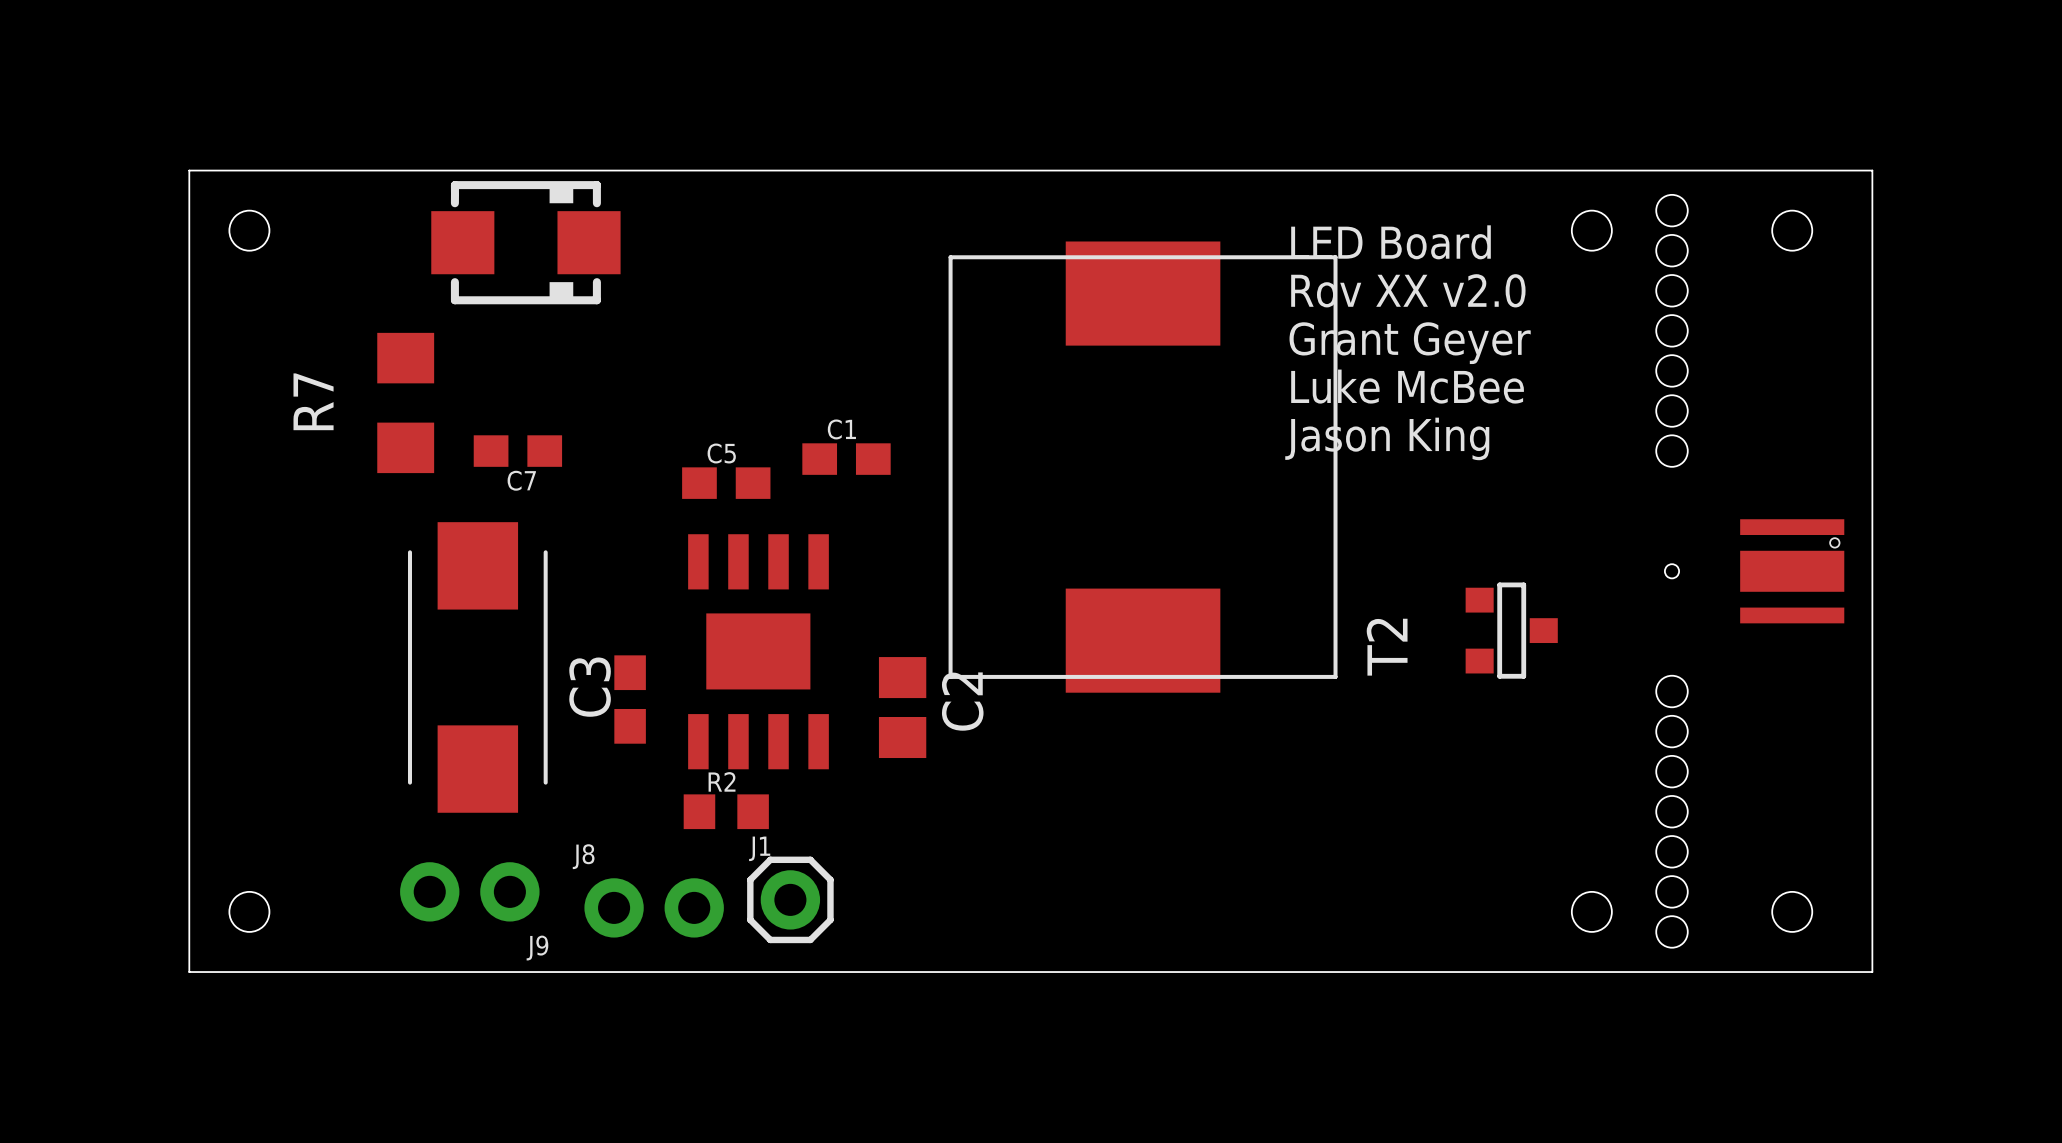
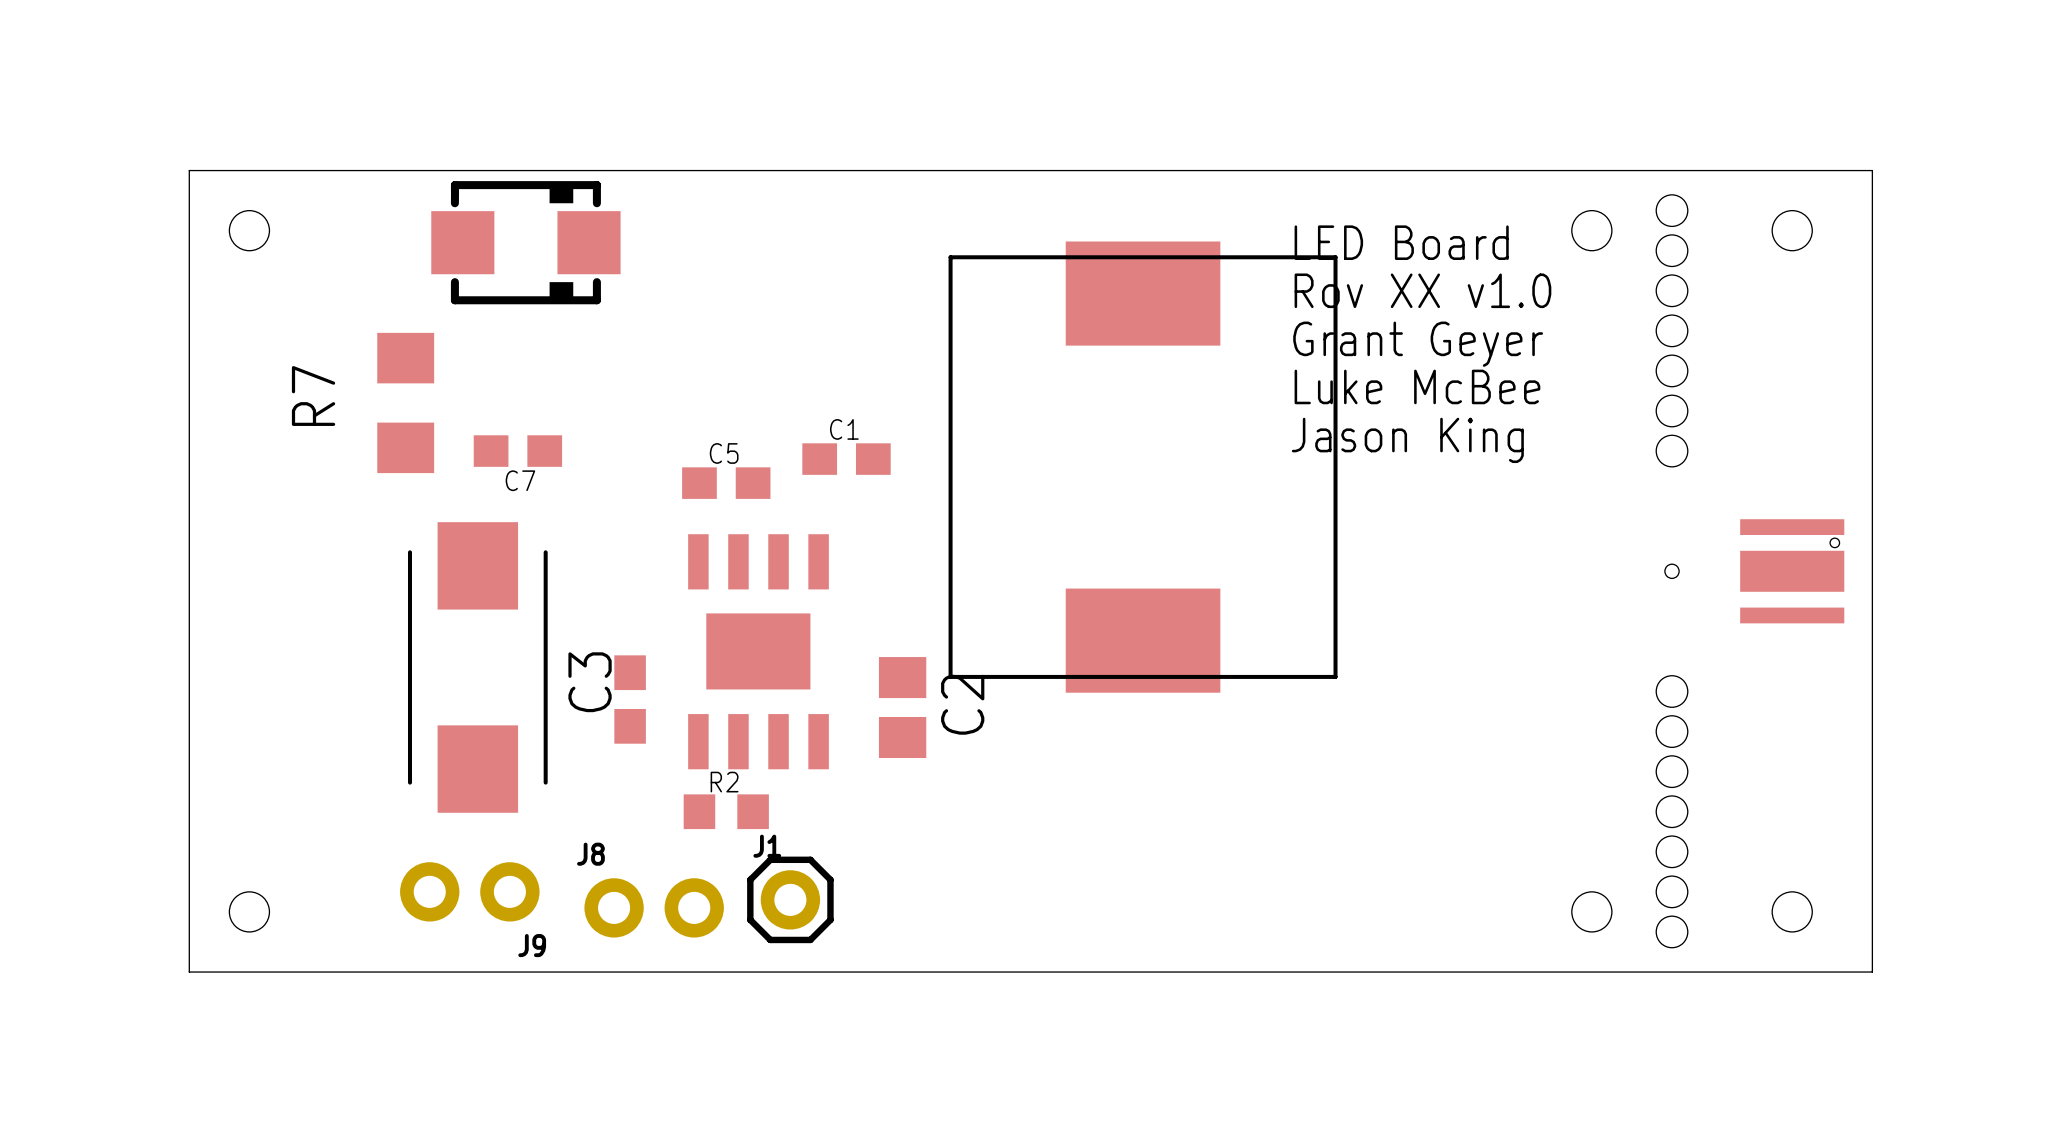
text: Rov XX v2.0 (1408, 290) -> Rov XX v1.0 (1422, 290)
T2: (1511, 630) -> none

